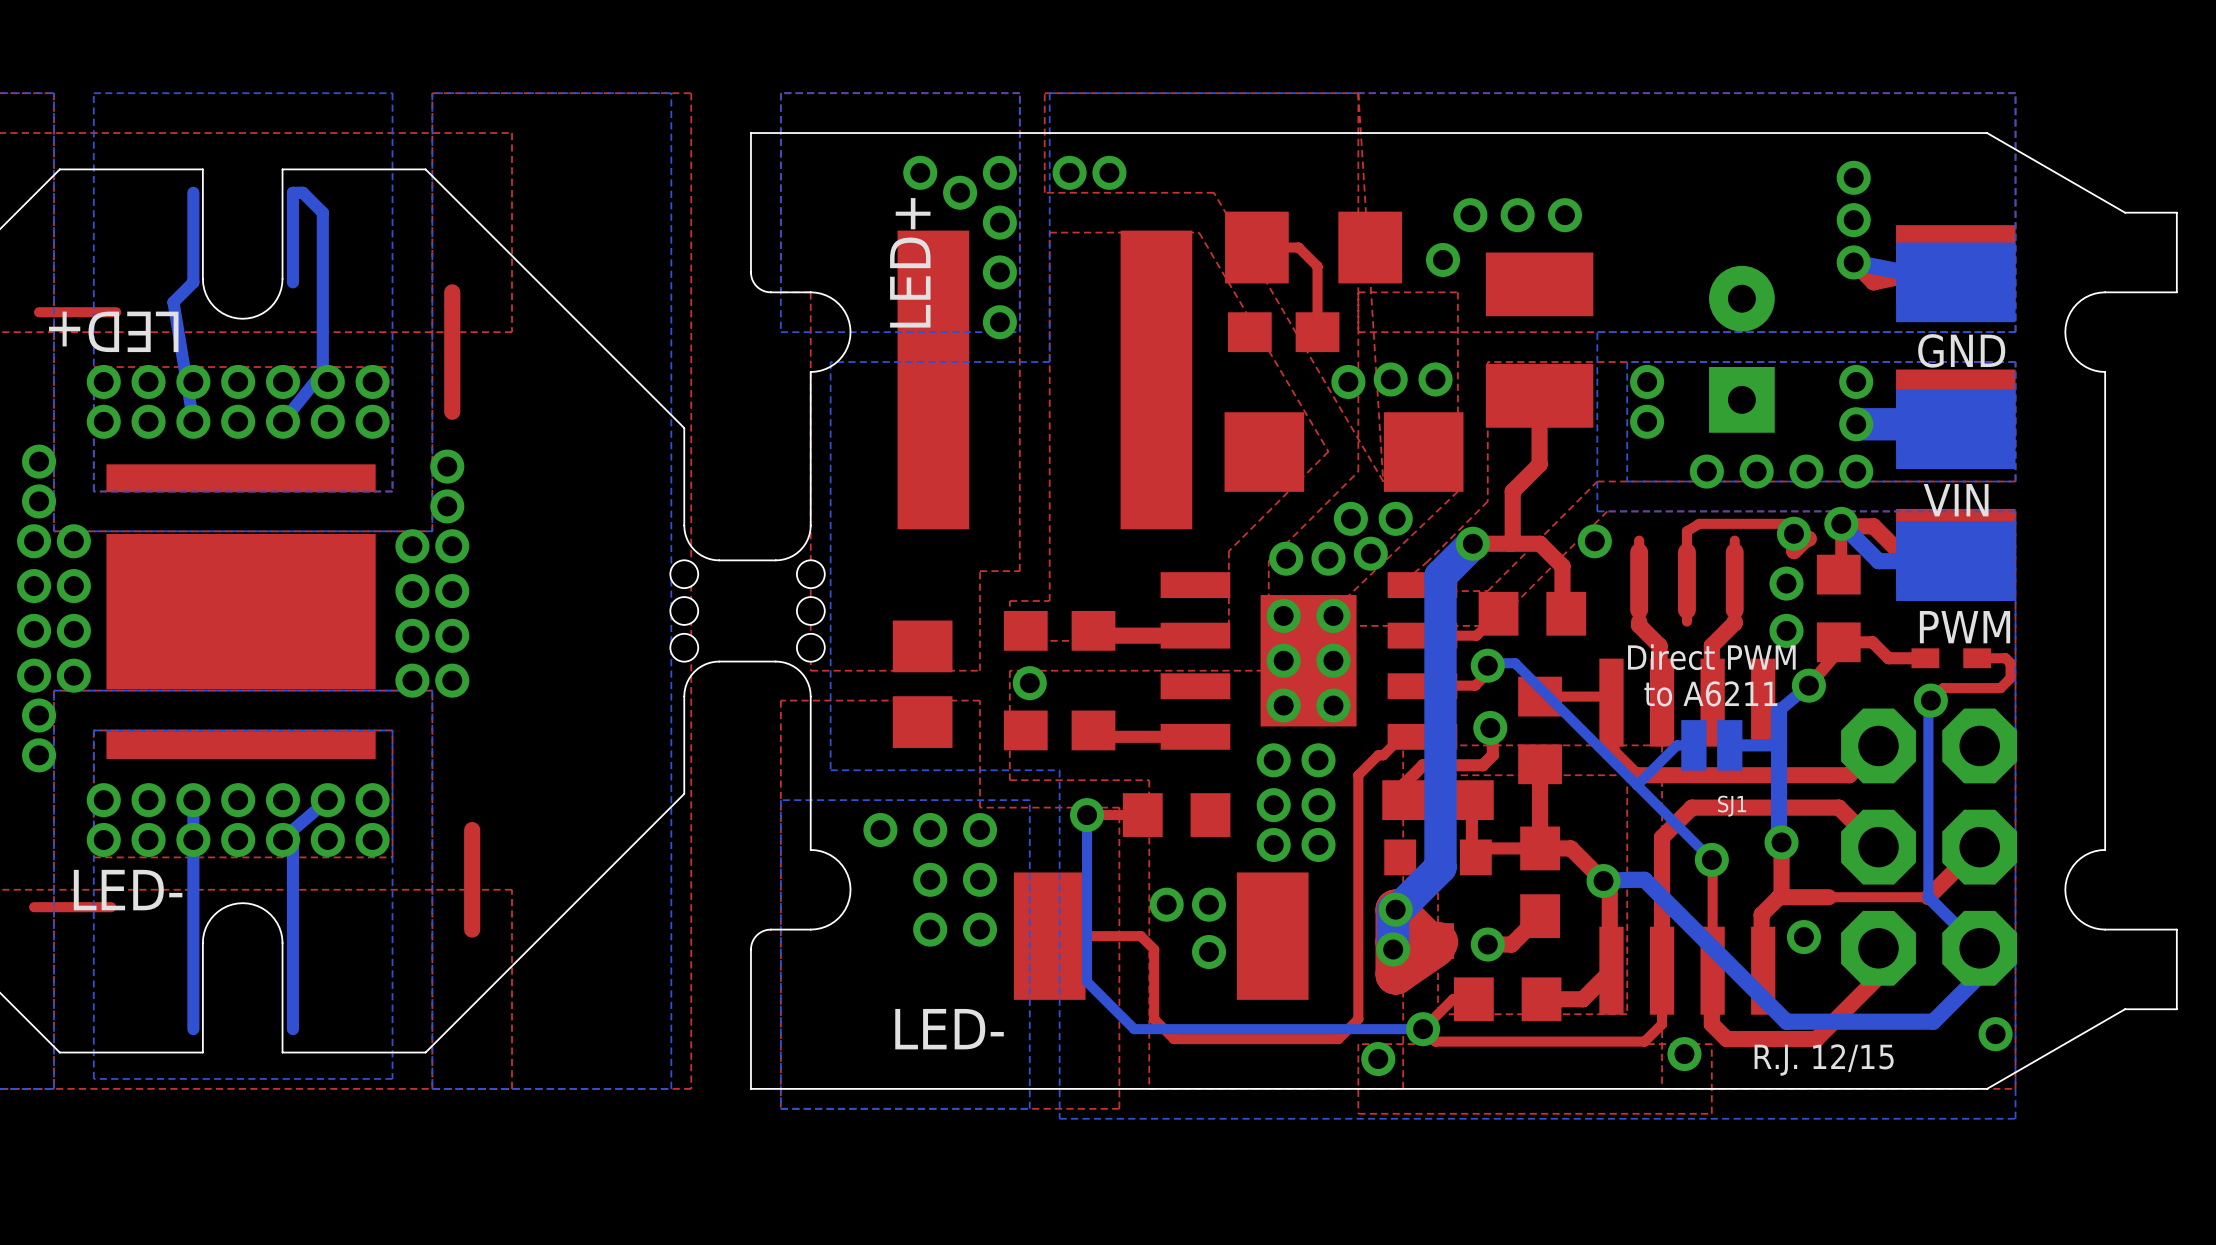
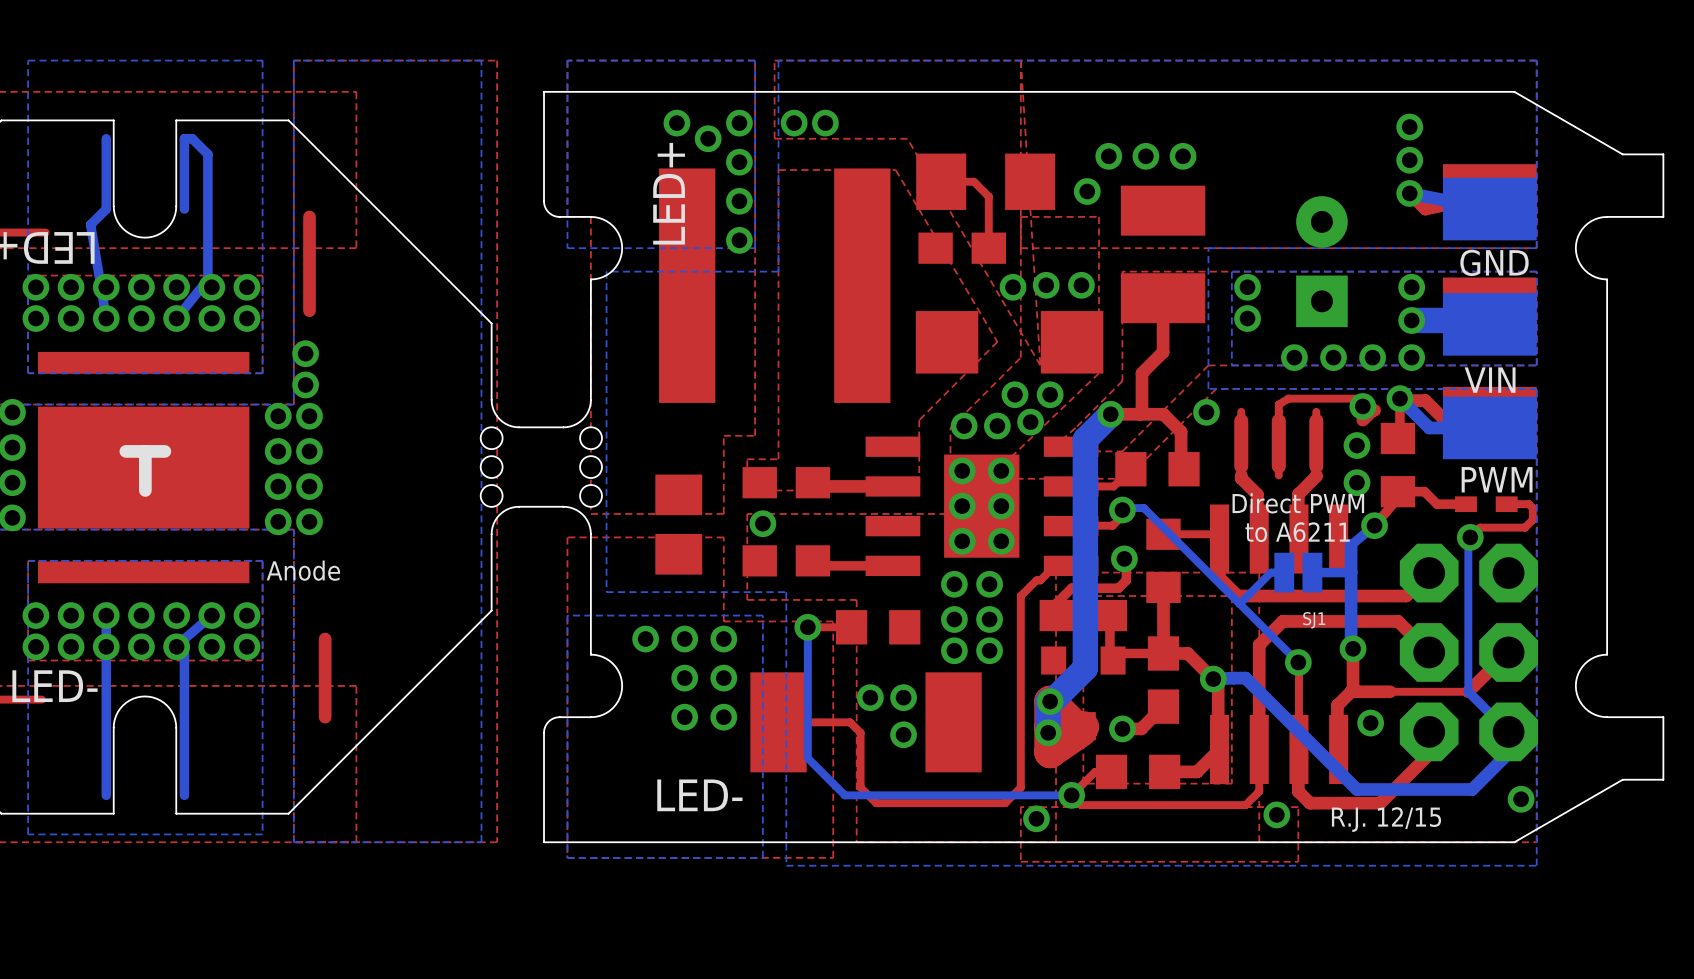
line: none -> (145, 451) (145, 490)
line: none -> (164, 451) (125, 451)
text: none -> Anode (303, 570)

